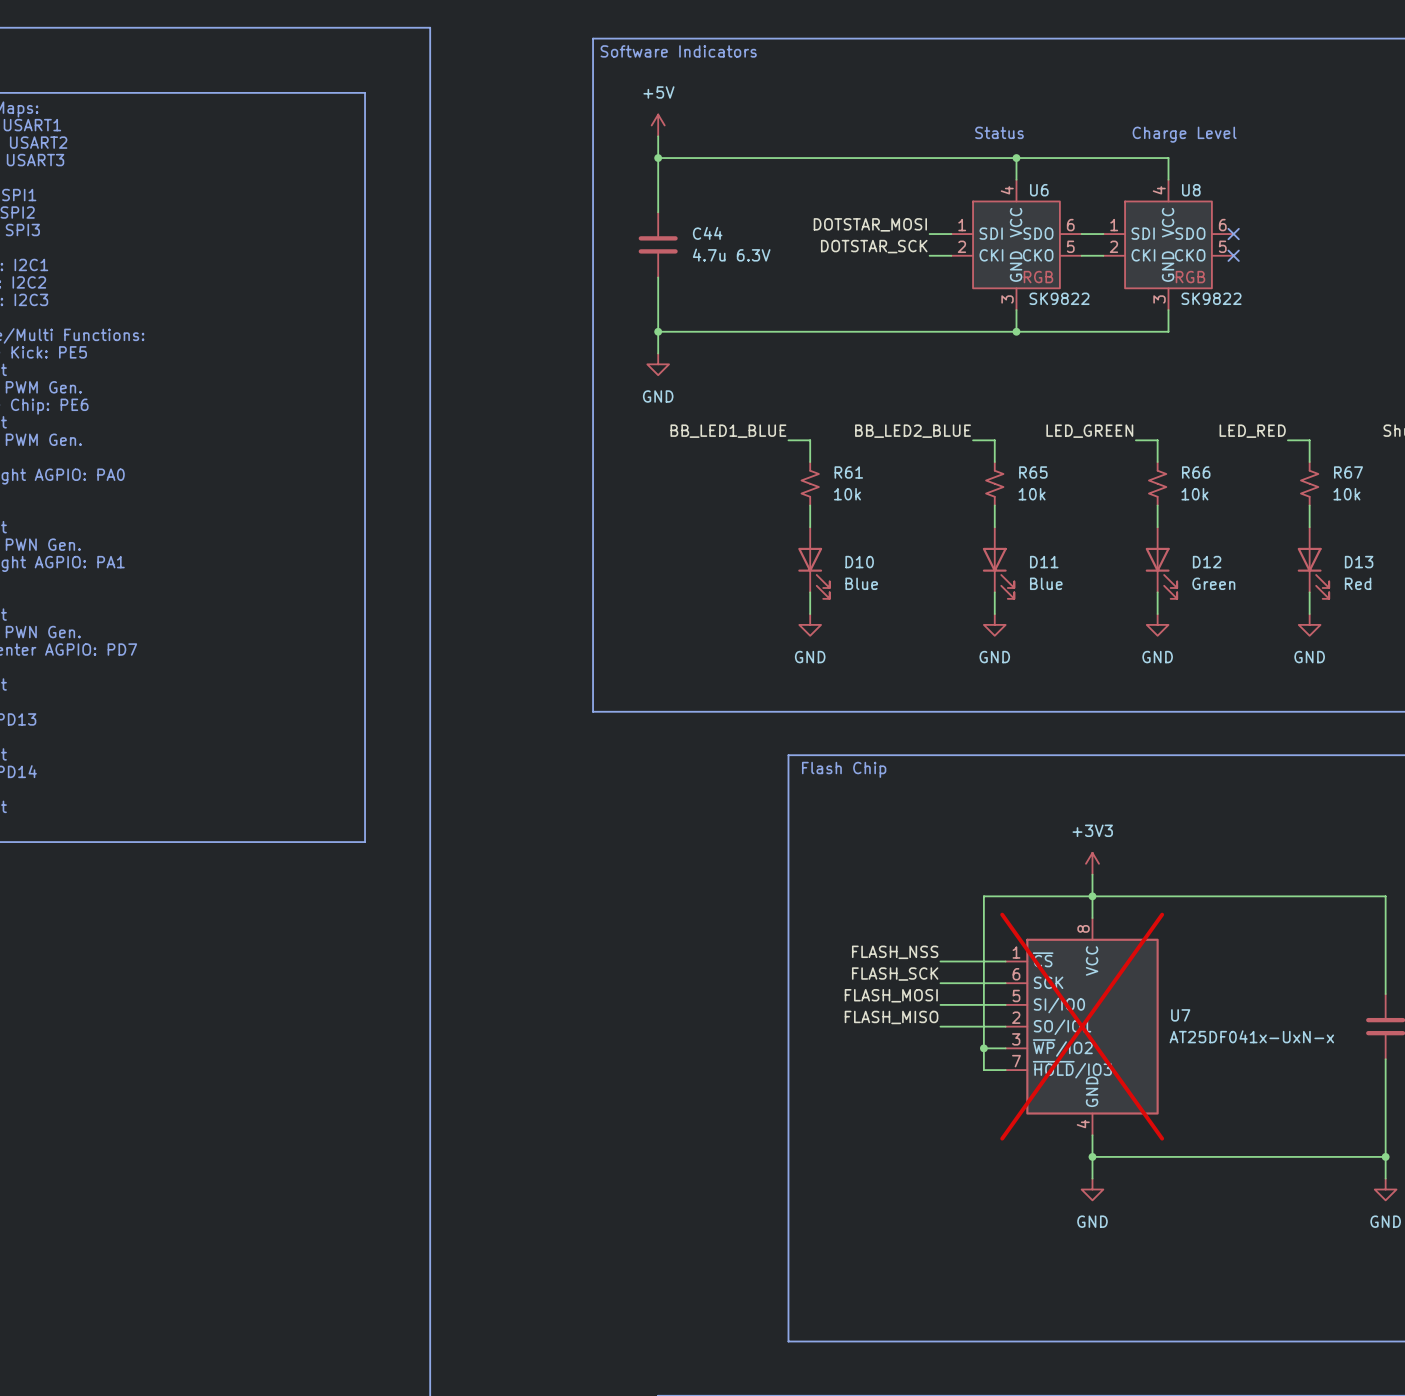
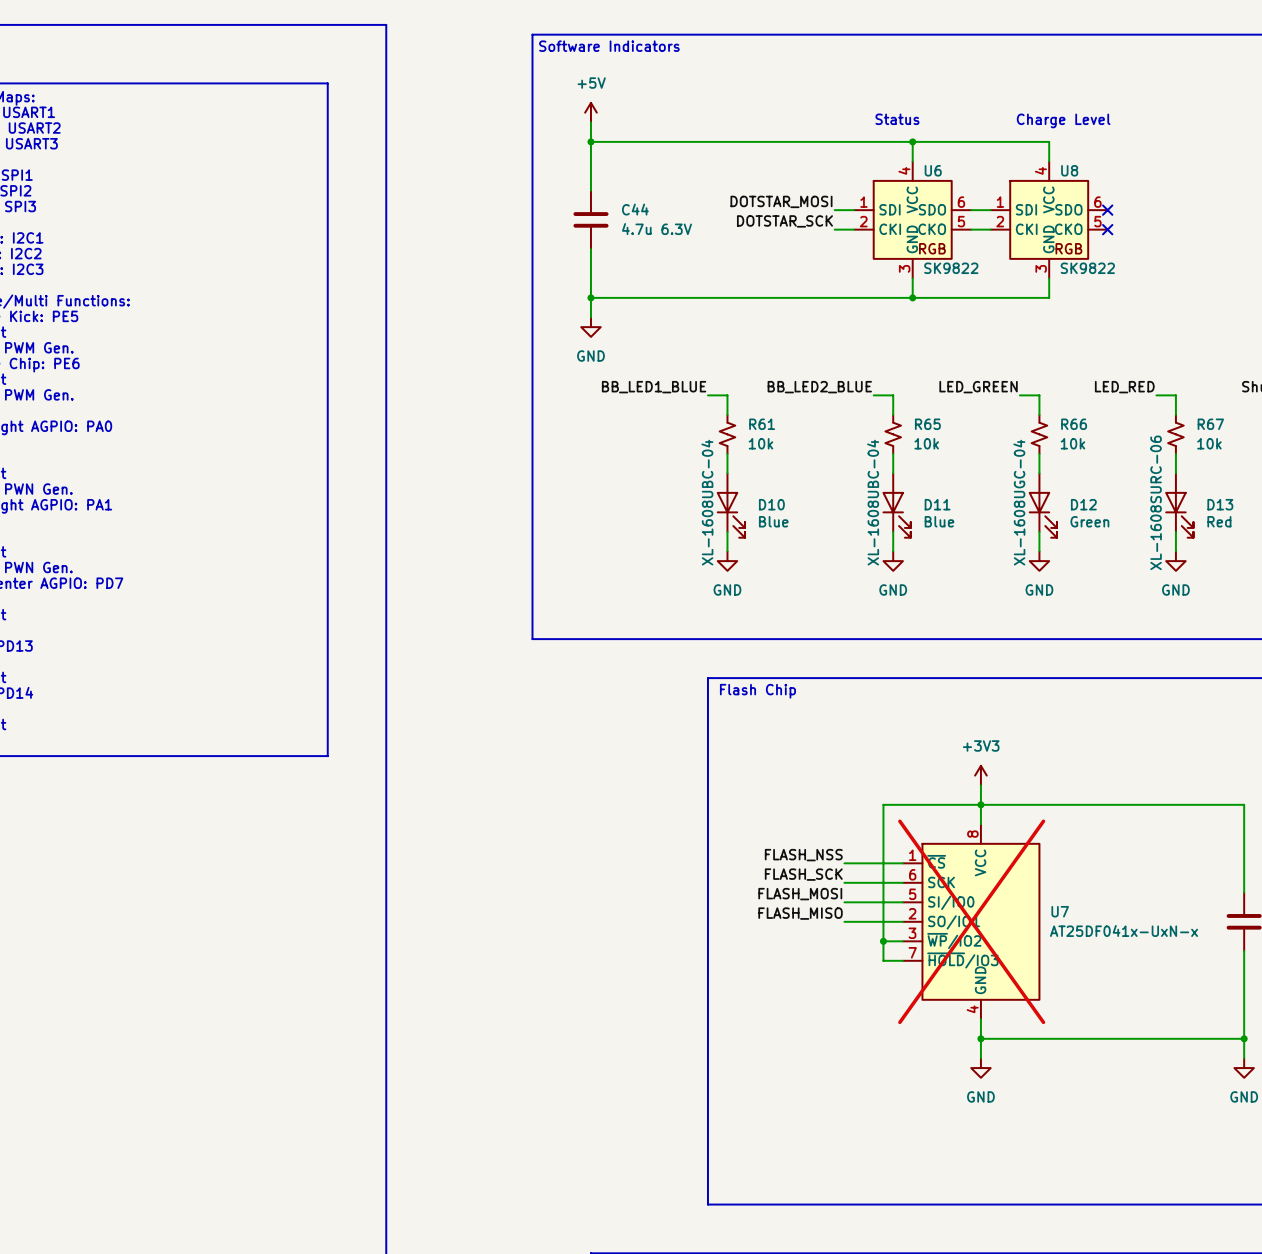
D10 text: none -> Blue (773, 521)
D11 text: none -> Blue (939, 521)
D12 text: none -> Green (1089, 521)
D13 text: none -> Red (1219, 521)
D10 value: Blue (861, 583) -> XL-1608UBC-04 (707, 502)
D11 value: Blue (1046, 583) -> XL-1608UBC-04 (873, 502)
D12 value: Green (1213, 583) -> XL-1608UGC-04 (1019, 502)
D13 value: Red (1358, 583) -> XL-1608SURC-06 (1156, 502)

